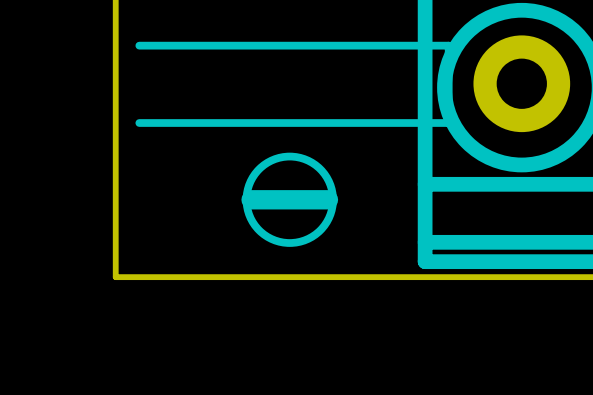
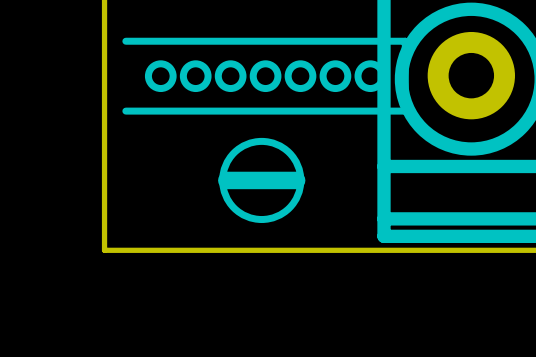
drawing: none -> [144, 60, 387, 93]

